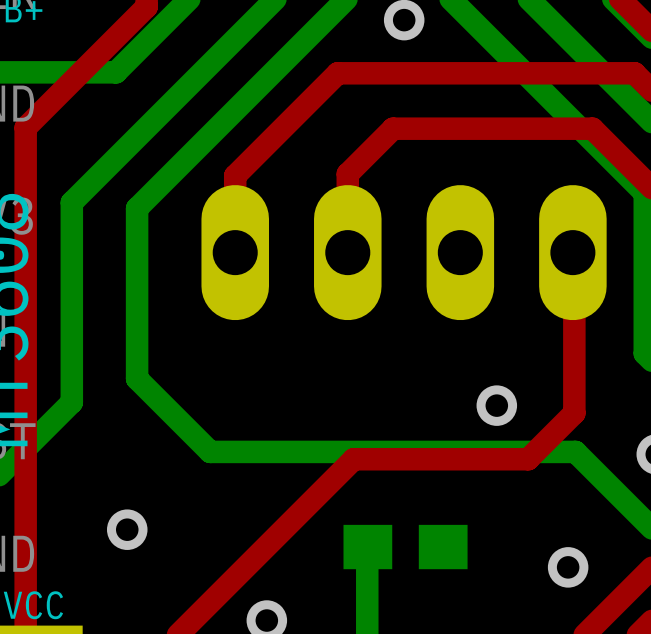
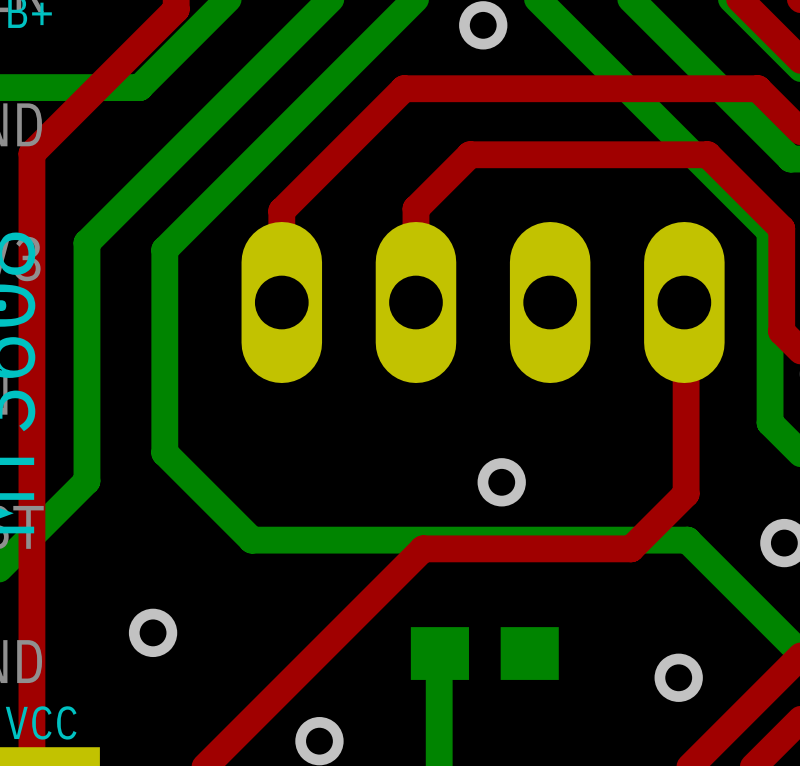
via position: (496, 405) -> (501, 482)

